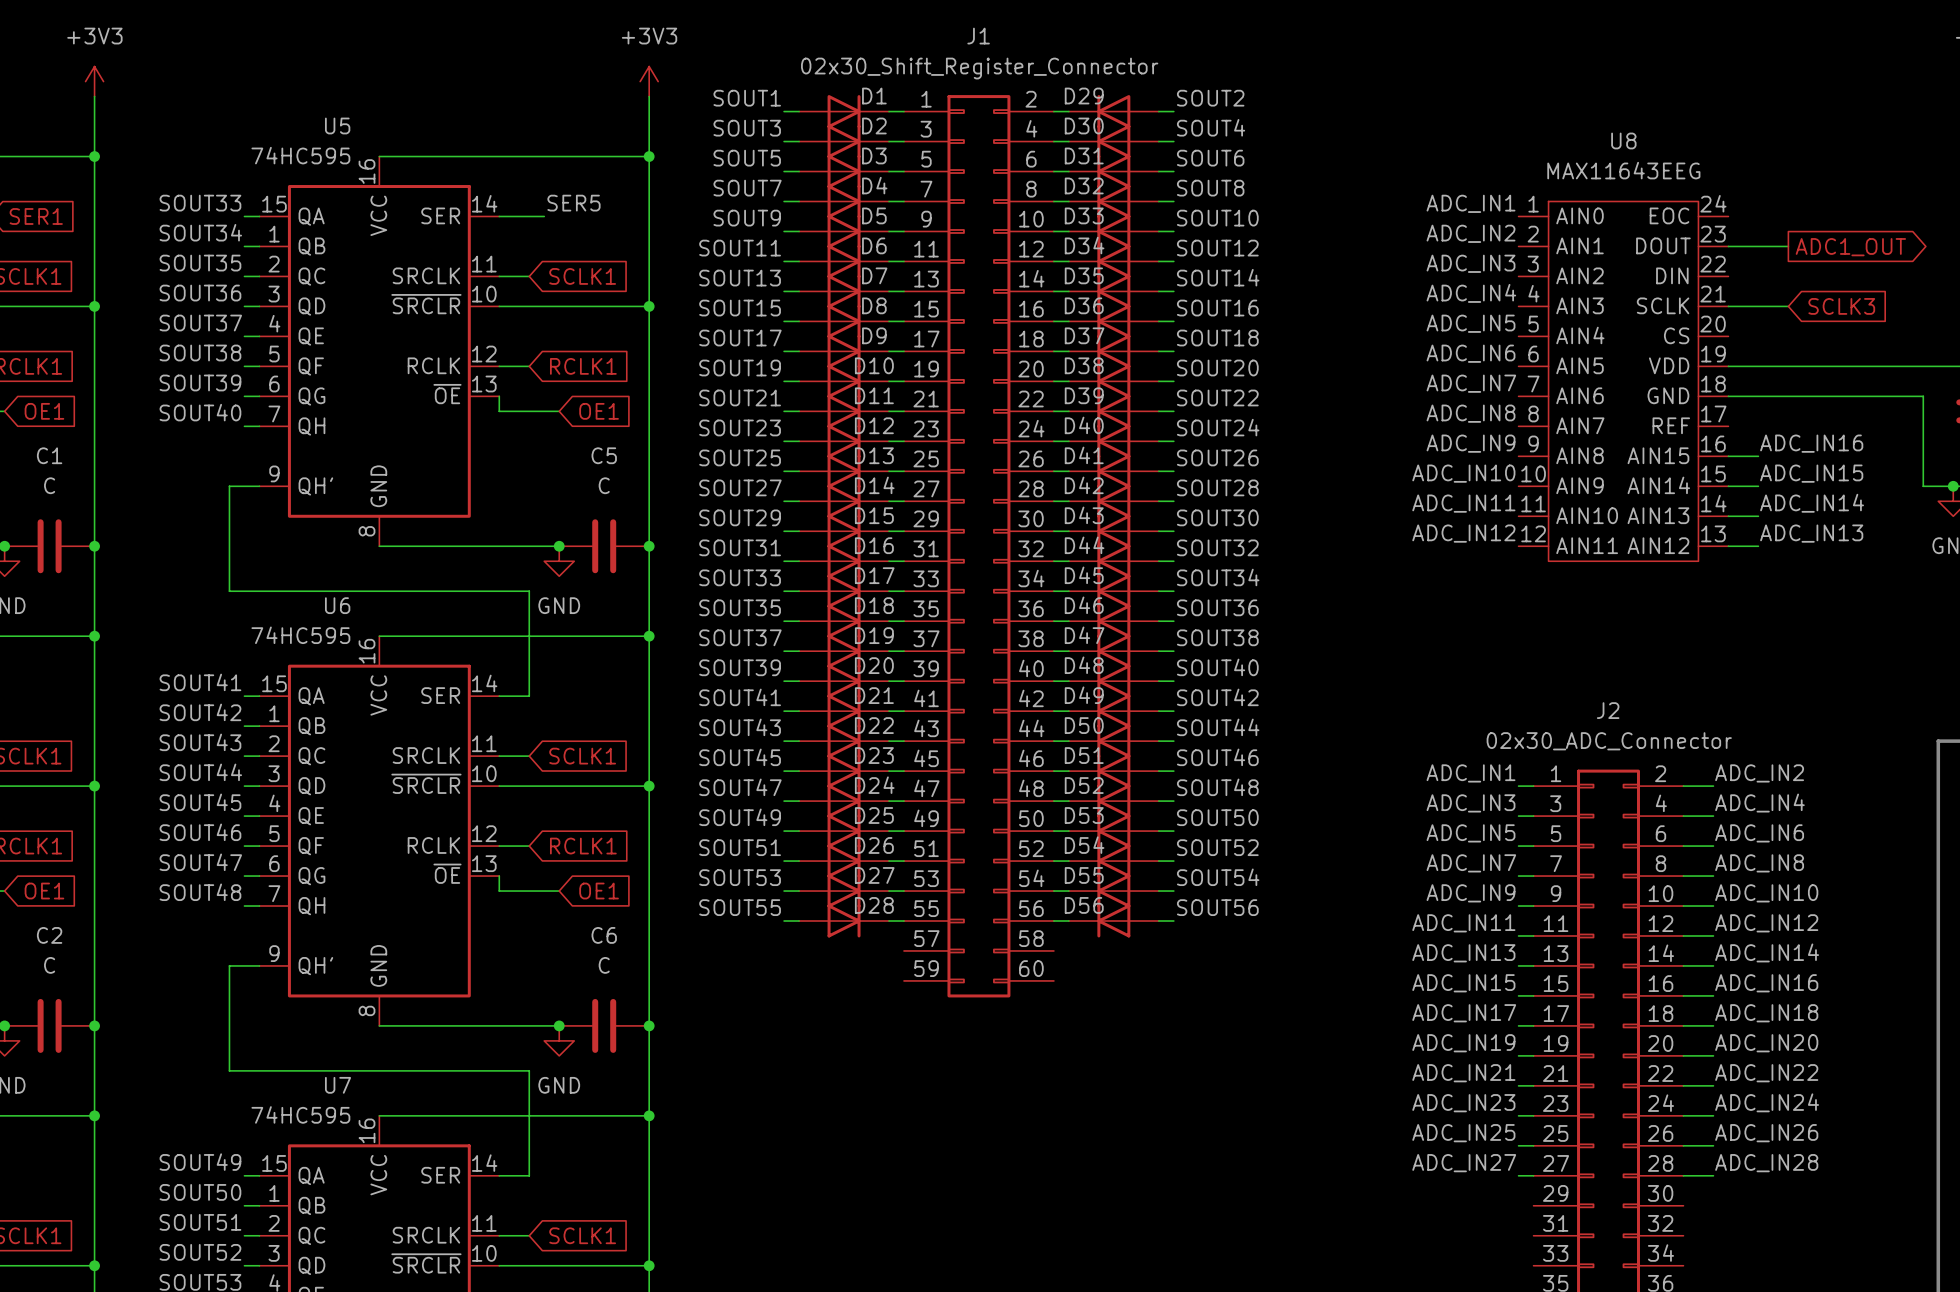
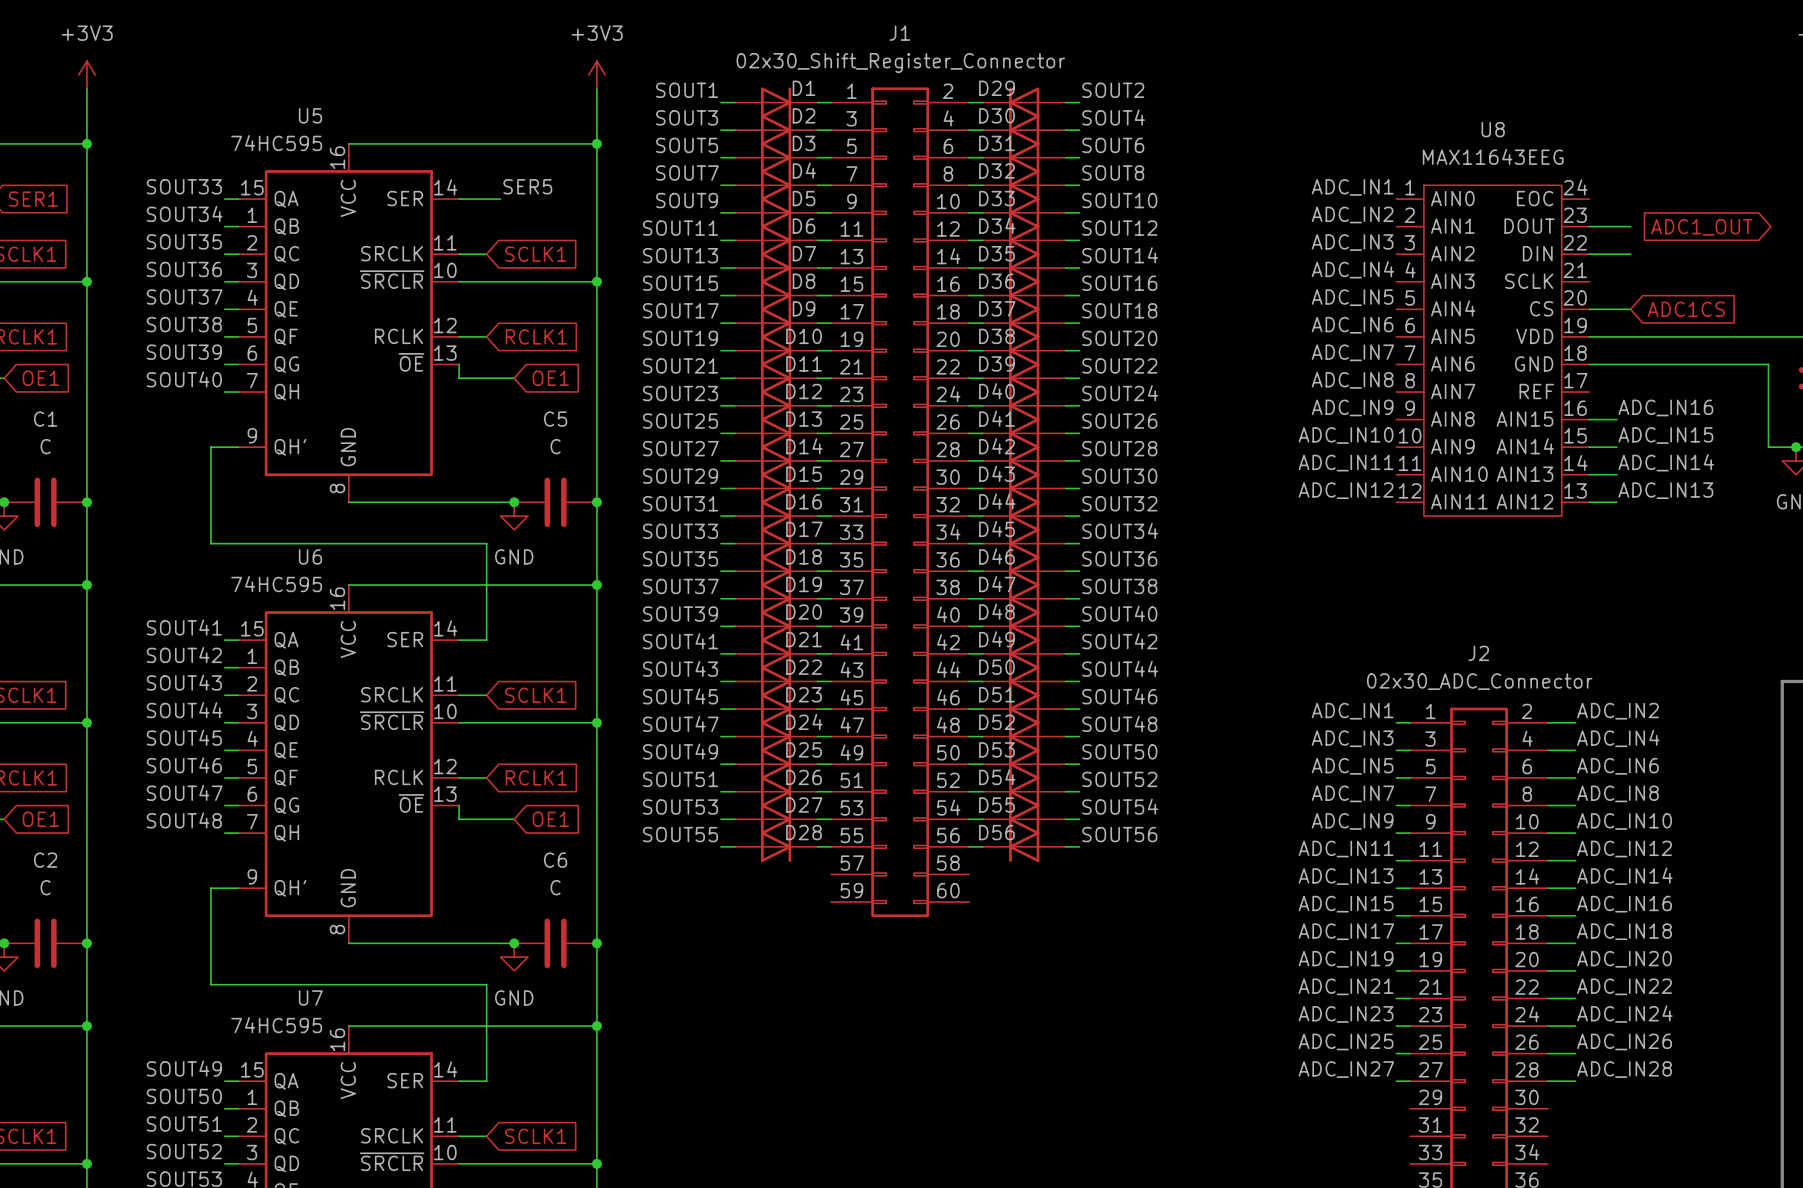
wire: (1773, 246) (1788, 246) -> none
wire: none -> (1589, 254) (1630, 254)
wire: (1728, 306) (1788, 306) -> none
global label: SCLK3 (1841, 306) -> none
wire: none -> (1589, 309) (1630, 309)
global label: none -> ADC1CS (1686, 309)

